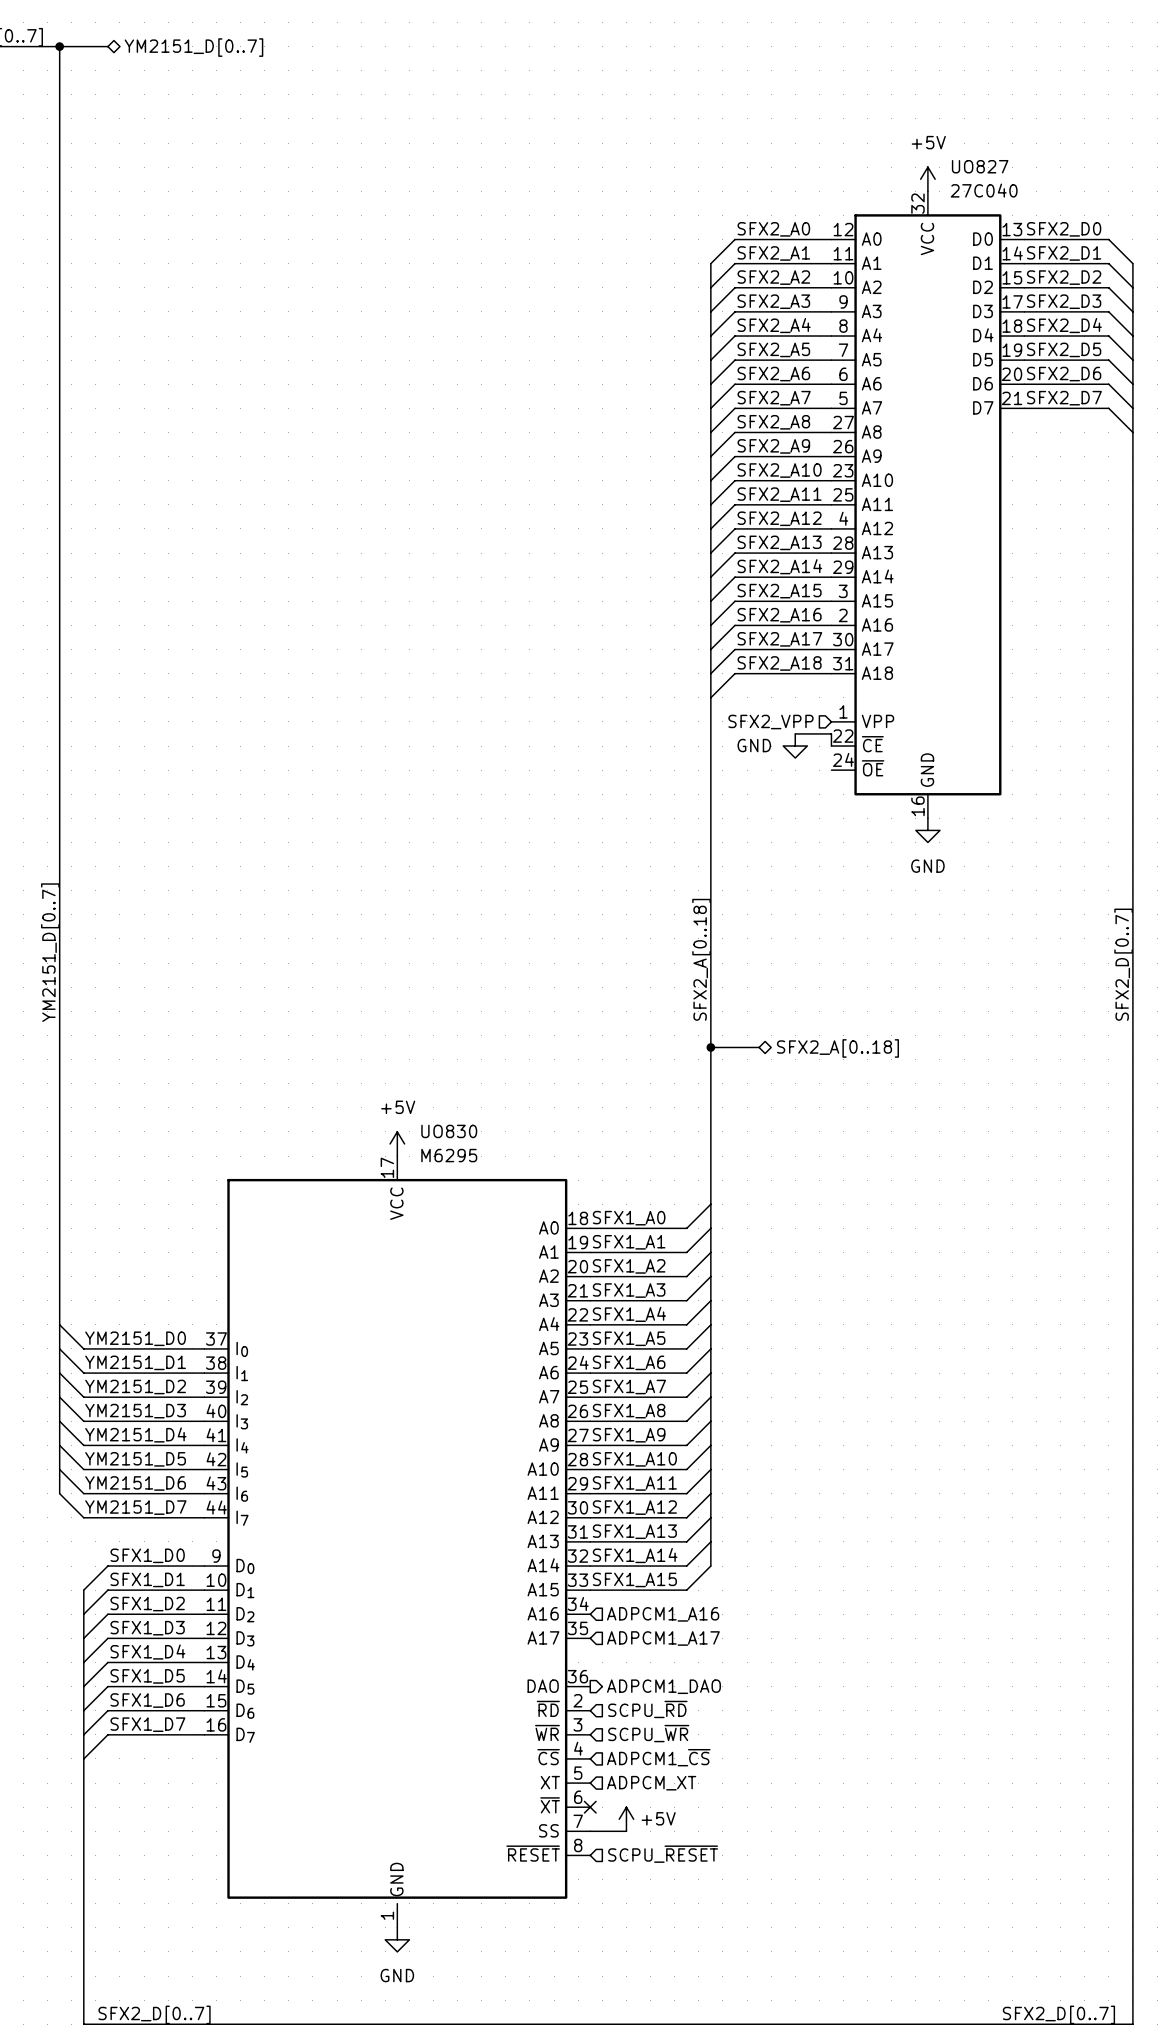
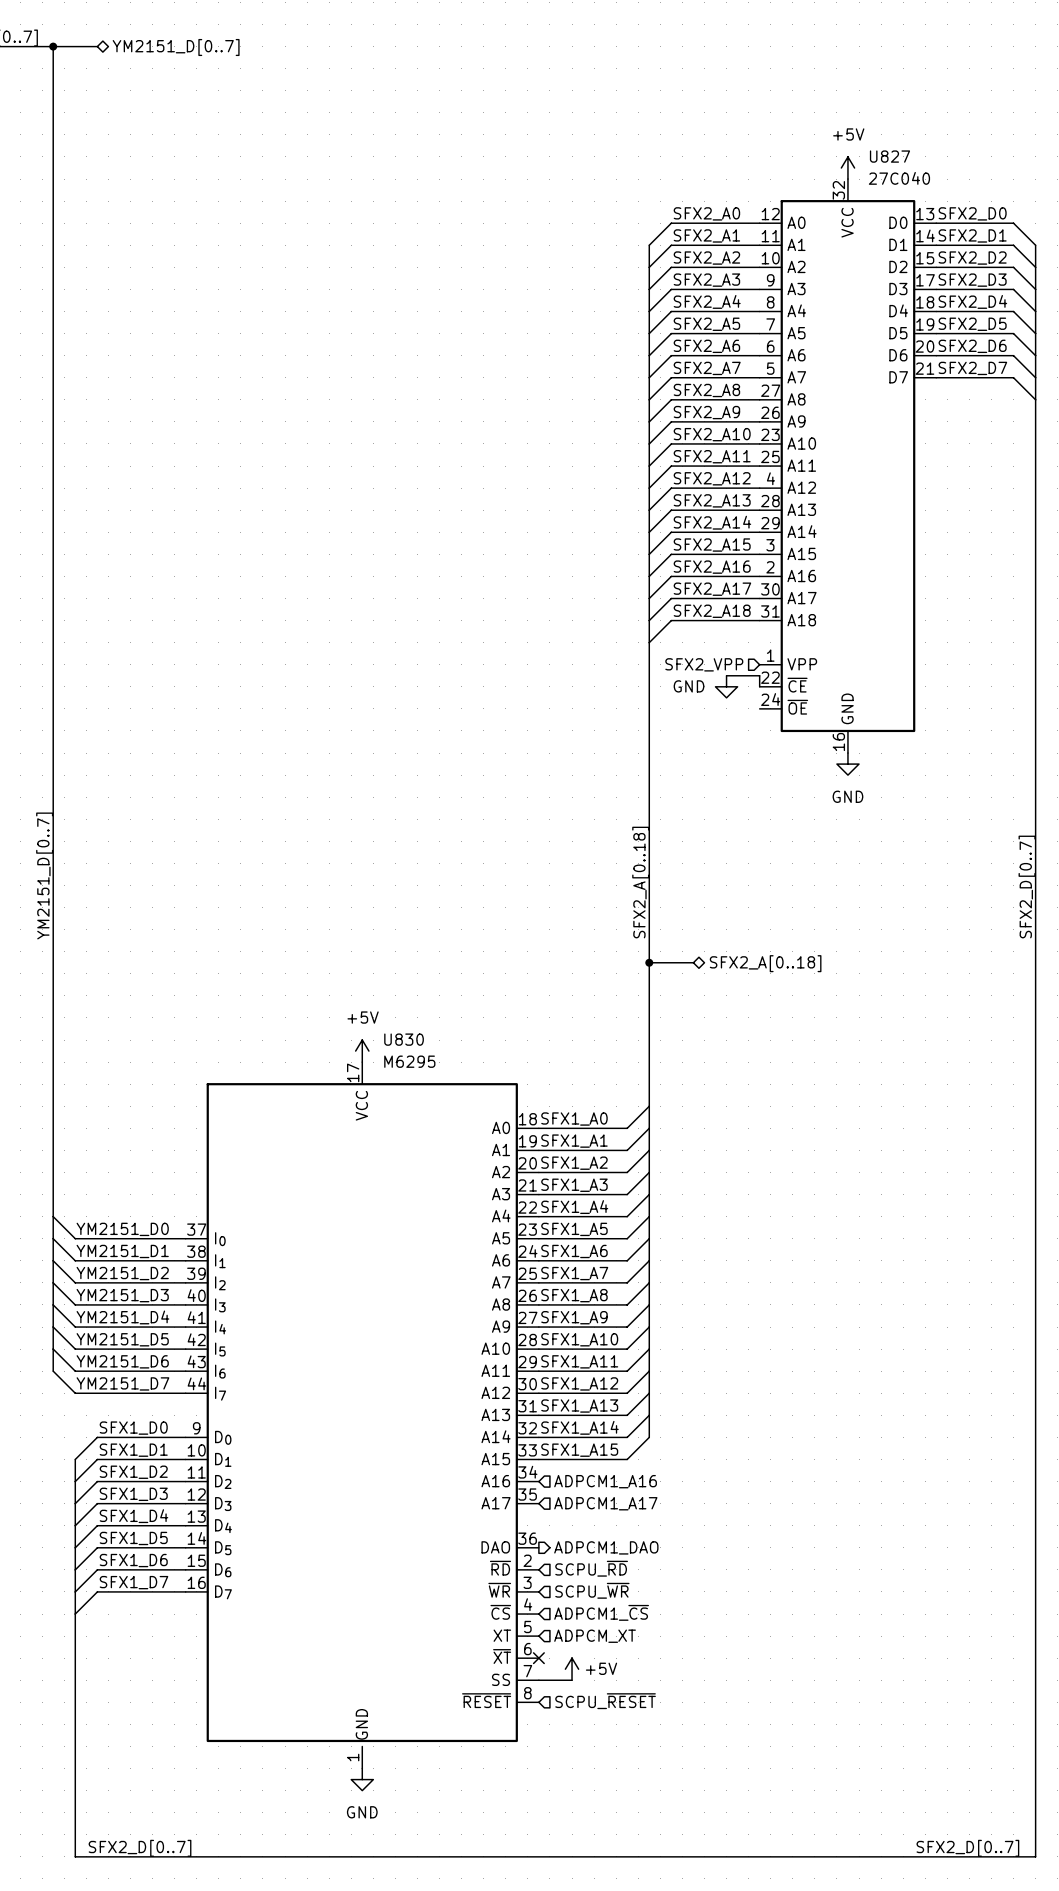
UO827 name: UO827 (980, 166) -> U827 (889, 156)
UO830 name: UO830 (449, 1131) -> U830 (404, 1039)

